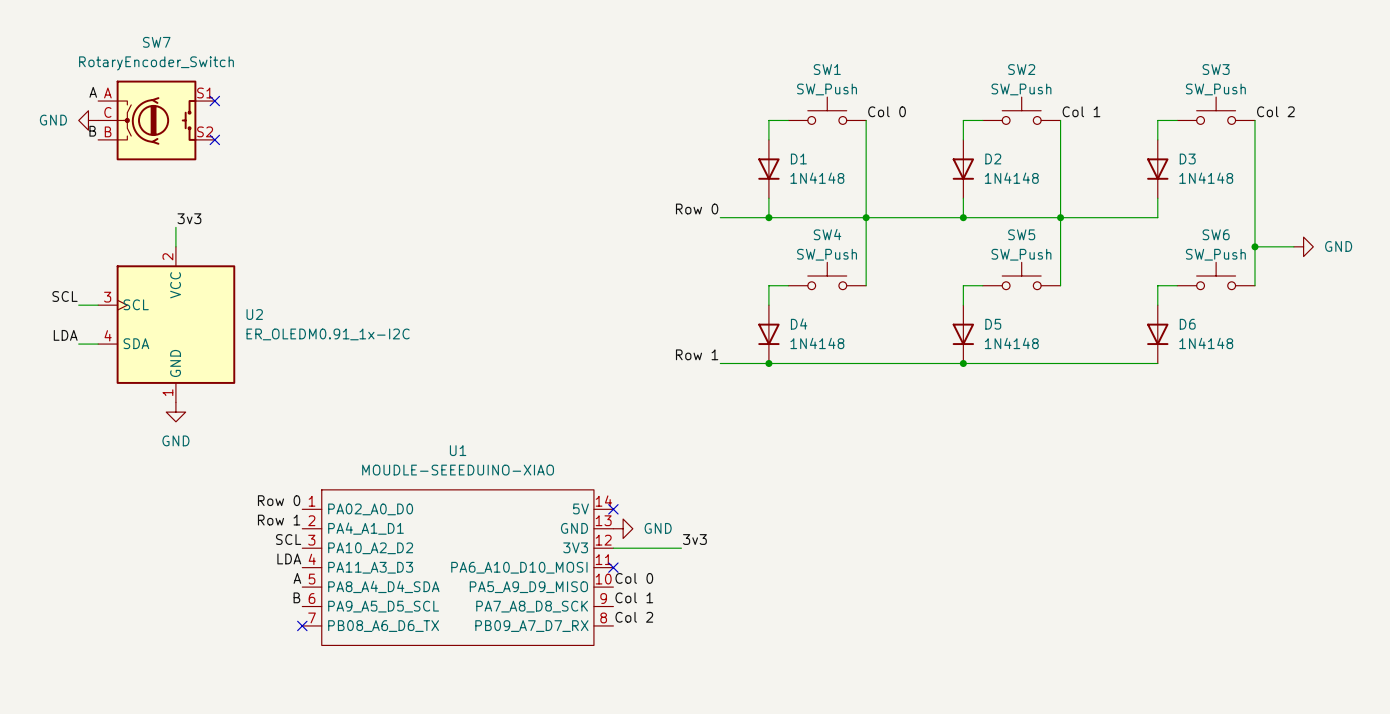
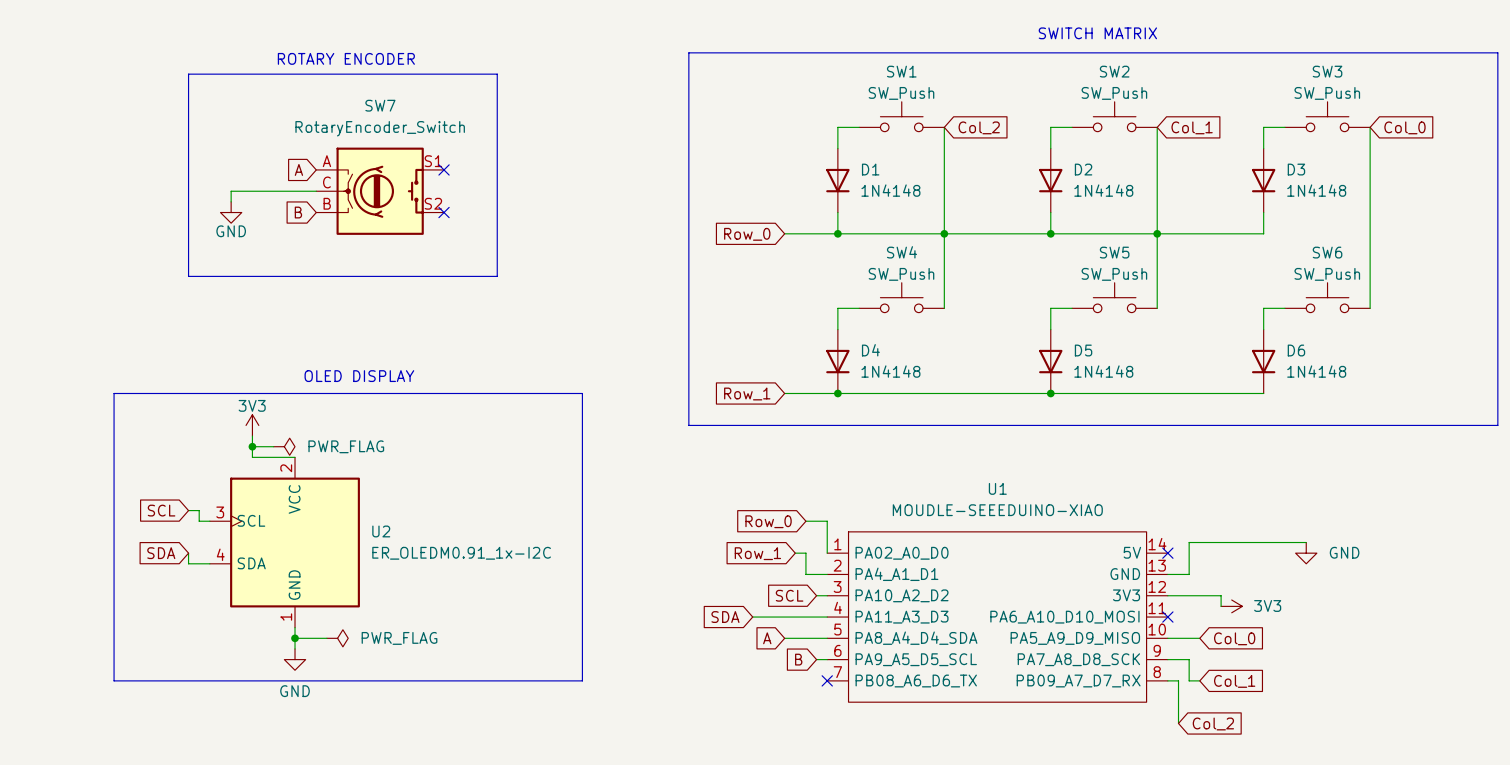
text: none -> SWITCH MATRIX (1097, 33)
line: none -> (688, 52) (1497, 52) (1497, 425) (688, 425) (688, 52)
text: none -> ROTARY ENCODER (346, 58)
line: none -> (188, 74) (497, 74) (497, 276) (188, 276) (188, 74)
label: A (93, 92) -> none
no-connect mark: (214, 101) -> none
label: Col 0 (887, 111) -> none
label: Col 1 (1081, 111) -> none
label: Col 2 (1275, 111) -> none
power symbol: GND (88, 120) -> none
SW7 position: (156, 120) -> (380, 191)
global label: none -> Col_2 (979, 127)
global label: none -> Col_1 (1192, 127)
global label: none -> Col_0 (1404, 127)
label: B (92, 131) -> none
no-connect mark: (214, 139) -> none
global label: none -> A (298, 169)
no-connect mark: none -> (444, 169)
wire: none -> (316, 191) (231, 191) (231, 201)
power symbol: none -> GND (231, 212)
global label: none -> B (298, 212)
no-connect mark: none -> (444, 212)
label: Row 0 (697, 209) -> none
label: 3v3 (189, 218) -> none
global label: none -> Row_0 (747, 234)
wire: (1254, 246) (1293, 246) -> none
junction: (1254, 246) -> none
power symbol: GND (1303, 246) -> none
label: SCL (65, 296) -> none
wire: (78, 305) (98, 305) -> none
U2 position: (166, 324) -> (284, 542)
label: LDA (65, 335) -> none
wire: (78, 344) (98, 344) -> (252, 446) (273, 446)
text: none -> OLED DISPLAY (359, 376)
label: Row 1 (697, 354) -> none
line: none -> (114, 393) (582, 393) (582, 680) (114, 680) (114, 393)
global label: none -> Row_1 (747, 394)
power symbol: none -> 3V3 (252, 425)
wire: none -> (252, 436) (252, 457) (295, 457)
power symbol: GND (175, 412) -> none
junction: none -> (252, 446)
power symbol: none -> PWR_FLAG (284, 446)
global label: none -> SCL (161, 510)
wire: none -> (188, 510) (199, 510) (199, 521) (209, 521)
global label: none -> Row_0 (768, 521)
wire: none -> (805, 521) (827, 521) (827, 553)
wire: none -> (1306, 542) (1189, 542) (1189, 574) (1167, 574)
label: Row 0 (279, 500) -> none
global label: none -> SDA (161, 553)
wire: none -> (188, 553) (188, 563) (209, 563)
no-connect mark: (613, 509) -> none
global label: none -> Row_1 (757, 553)
wire: none -> (795, 553) (805, 553) (805, 574) (827, 574)
no-connect mark: none -> (1167, 553)
power symbol: none -> GND (1306, 553)
label: Row 1 (279, 520) -> none
power symbol: GND (623, 528) -> none
label: SCL (288, 539) -> none
label: 3v3 (694, 539) -> none
wire: (613, 548) (681, 548) -> (752, 617) (827, 617)
global label: none -> SCL (789, 595)
wire: none -> (816, 595) (827, 595)
wire: none -> (1167, 595) (1221, 595) (1221, 606)
power symbol: none -> 3V3 (1231, 606)
label: LDA (289, 558) -> none
U1 position: (457, 567) -> (997, 617)
no-connect mark: (613, 567) -> none
global label: none -> SDA (725, 617)
no-connect mark: none -> (1167, 617)
wire: none -> (295, 627) (295, 648)
label: A (297, 578) -> none
label: Col 0 (634, 578) -> none
wire: none -> (295, 638) (326, 638)
junction: none -> (295, 638)
power symbol: none -> PWR_FLAG (337, 638)
global label: none -> A (767, 638)
wire: none -> (784, 638) (827, 638)
wire: none -> (1167, 638) (1199, 638)
global label: none -> Col_0 (1234, 638)
label: B (296, 597) -> none
label: Col 1 (634, 597) -> none
power symbol: none -> GND (295, 659)
global label: none -> B (798, 659)
wire: none -> (816, 659) (827, 659)
wire: none -> (1167, 659) (1189, 659) (1189, 680) (1199, 680)
label: Col 2 (634, 617) -> none
no-connect mark: (302, 625) -> none
no-connect mark: none -> (827, 680)
wire: none -> (1167, 680) (1178, 680) (1178, 723)
global label: none -> Col_1 (1234, 681)
global label: none -> Col_2 (1213, 723)

